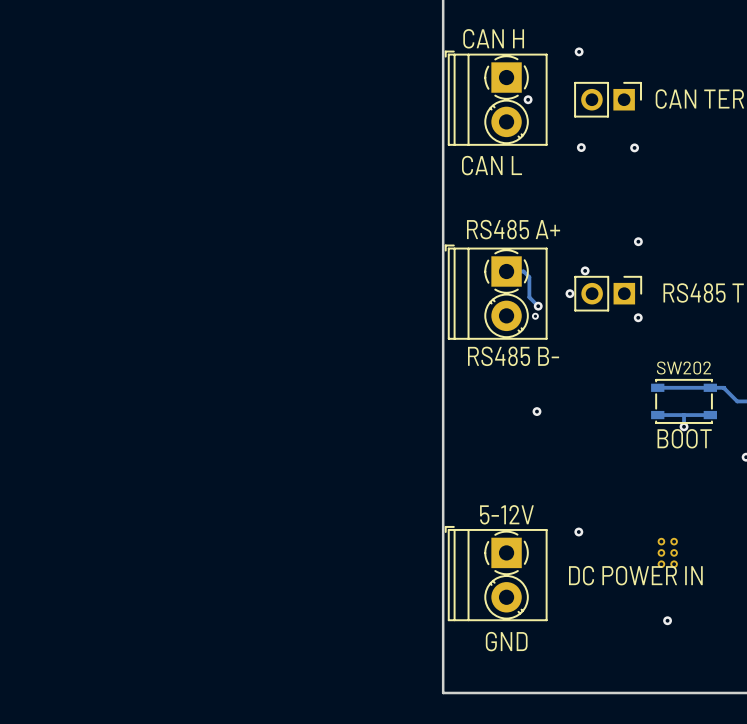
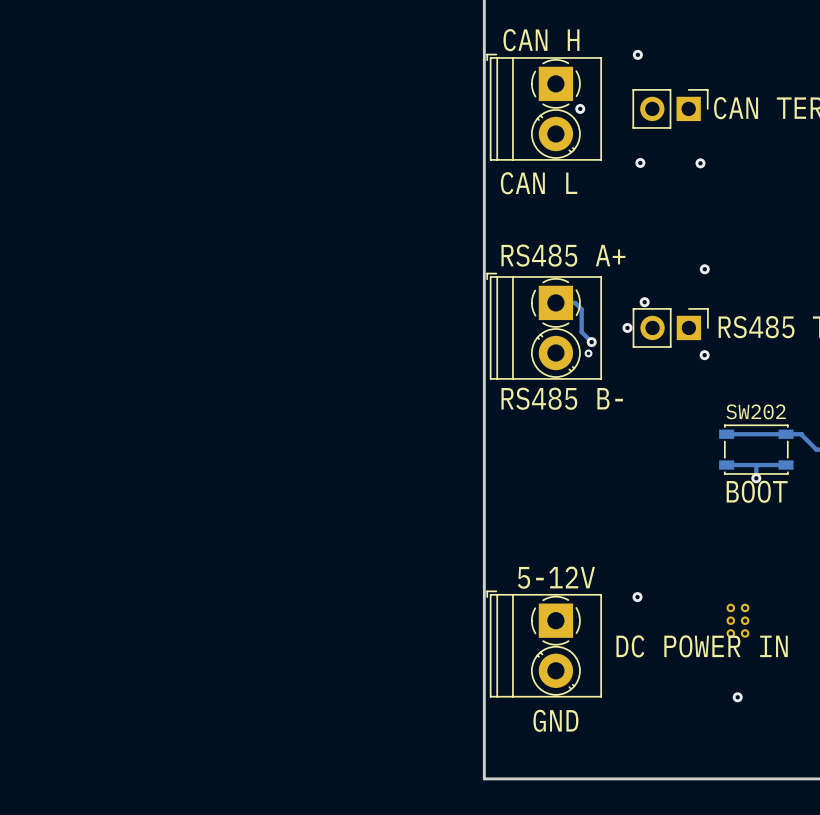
via: (536, 411) -> none

